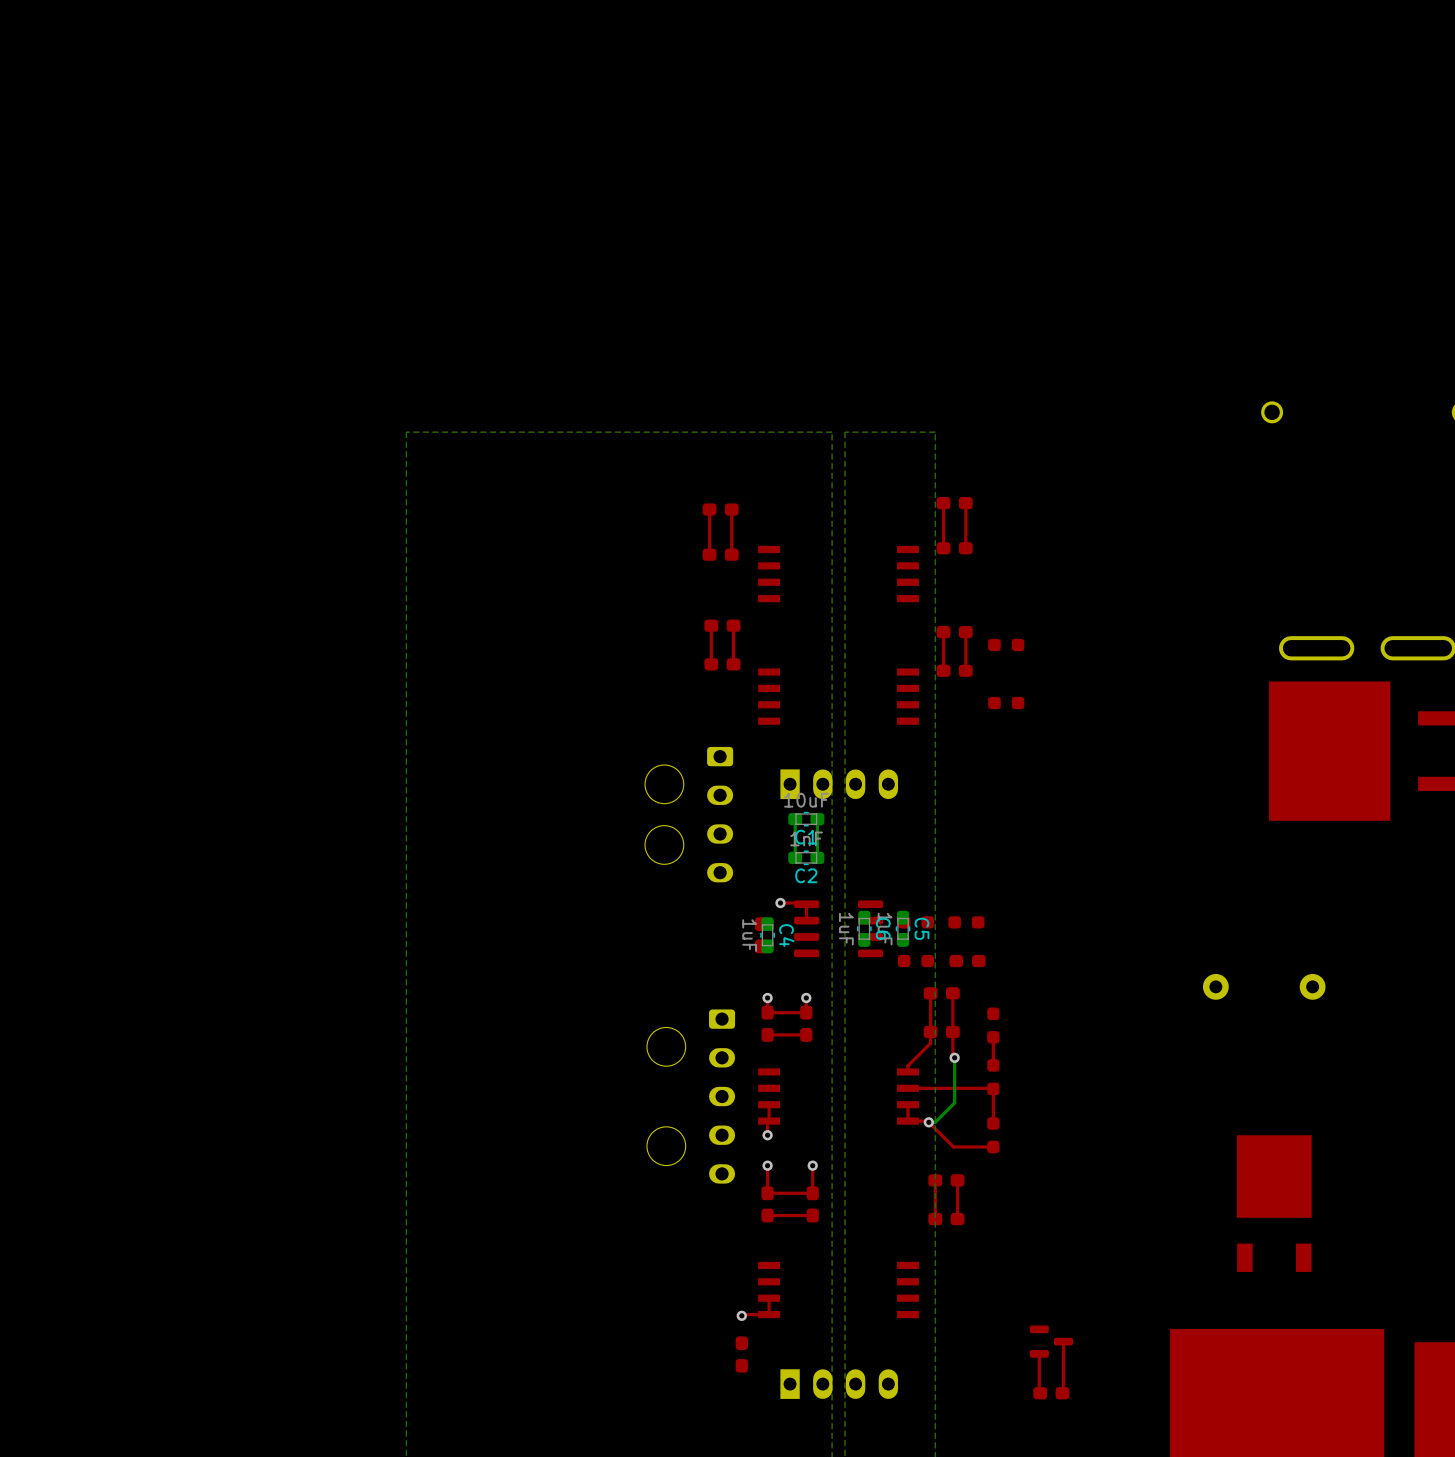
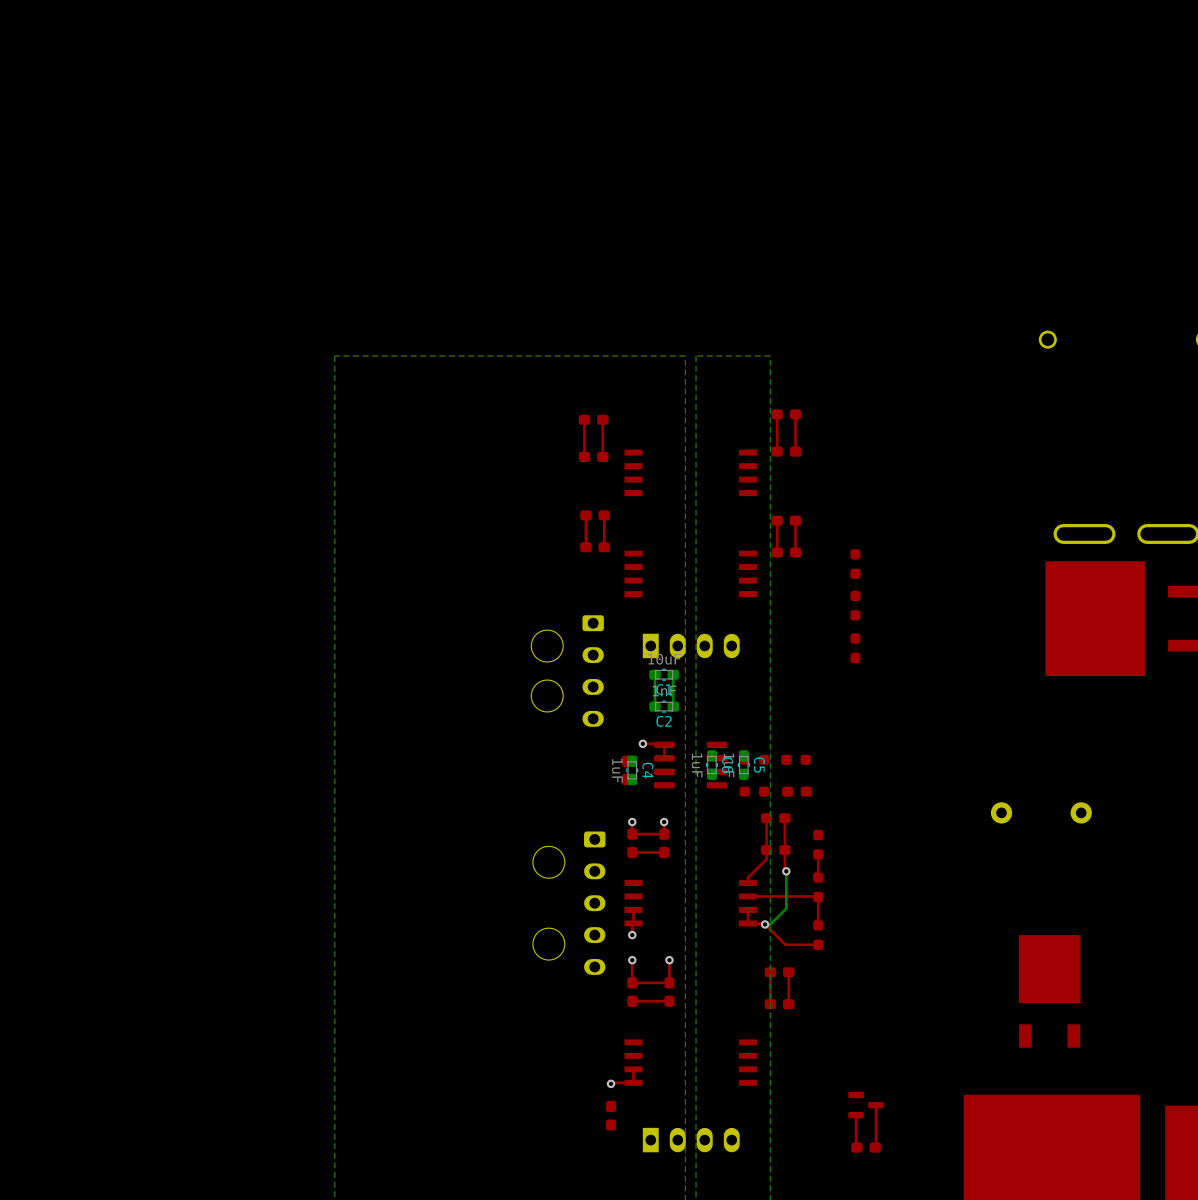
part: (1006, 645) -> none
part: none -> (855, 564)
part: (1006, 703) -> none
part: none -> (855, 605)
part: none -> (855, 648)

